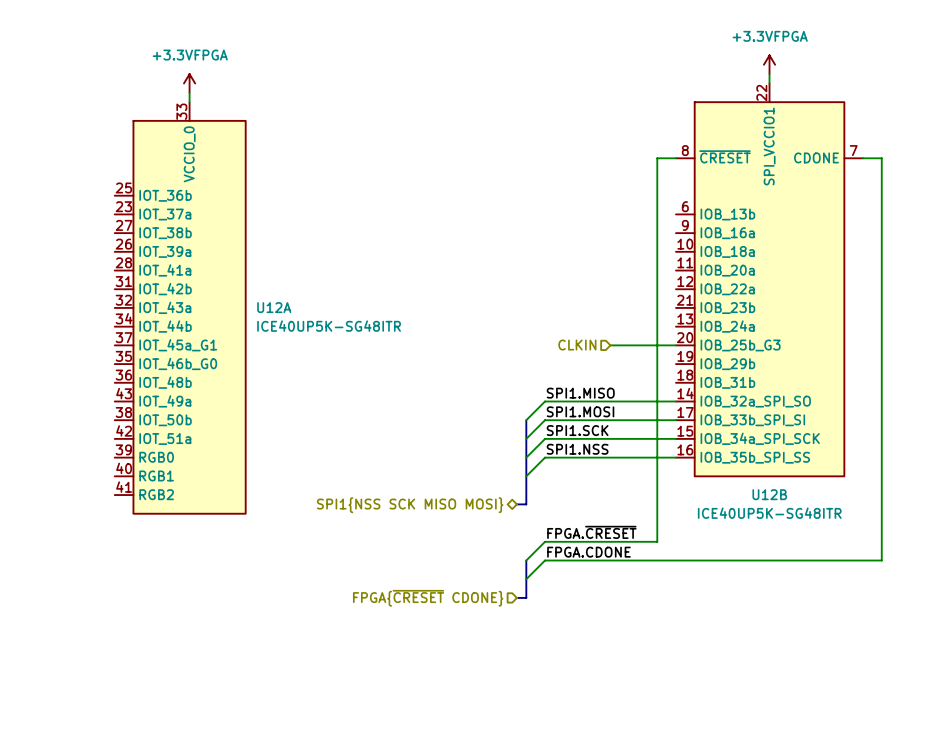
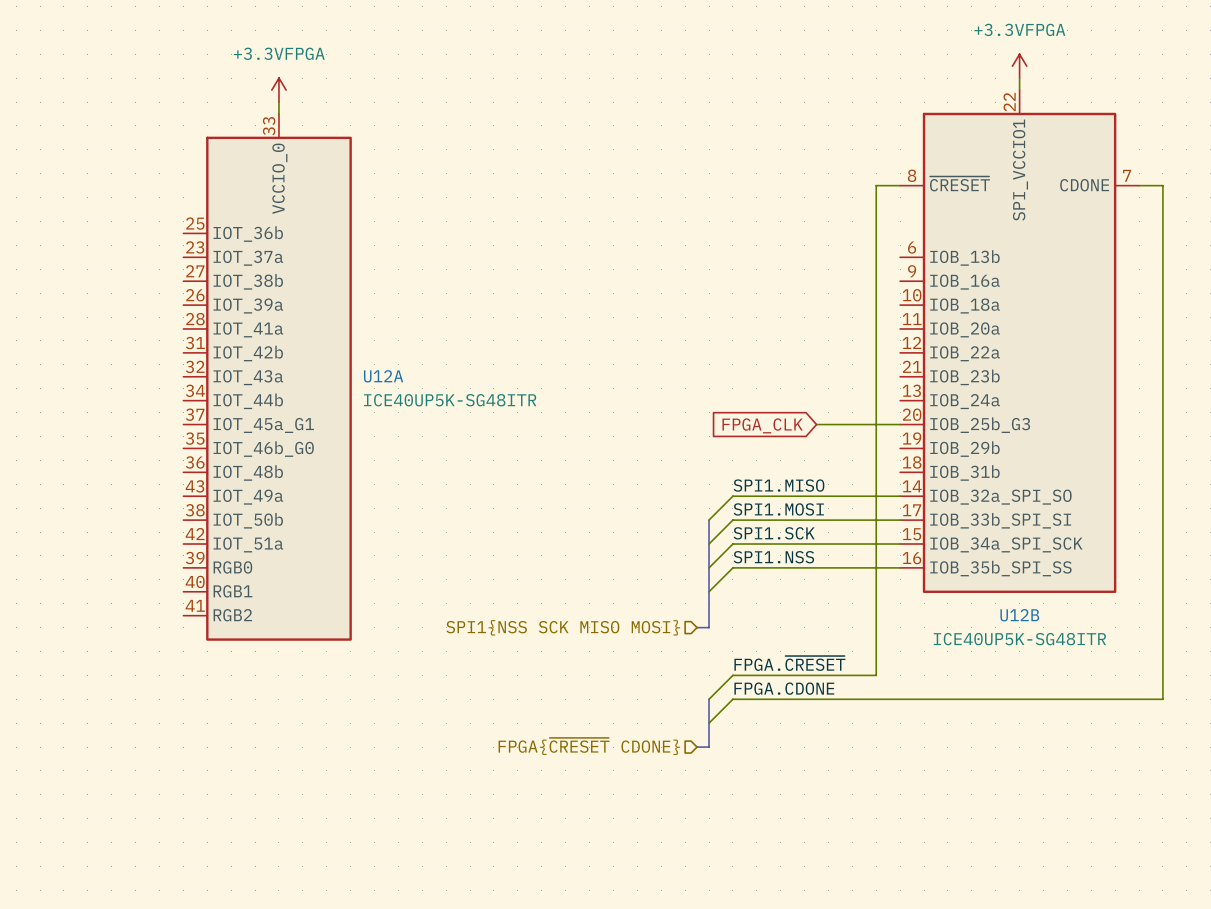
global label: none -> FPGA_CLK (762, 425)
hierarchical label: CLKIN (577, 345) -> none
hierarchical label shape: bidirectional (410, 505) -> input (563, 627)

